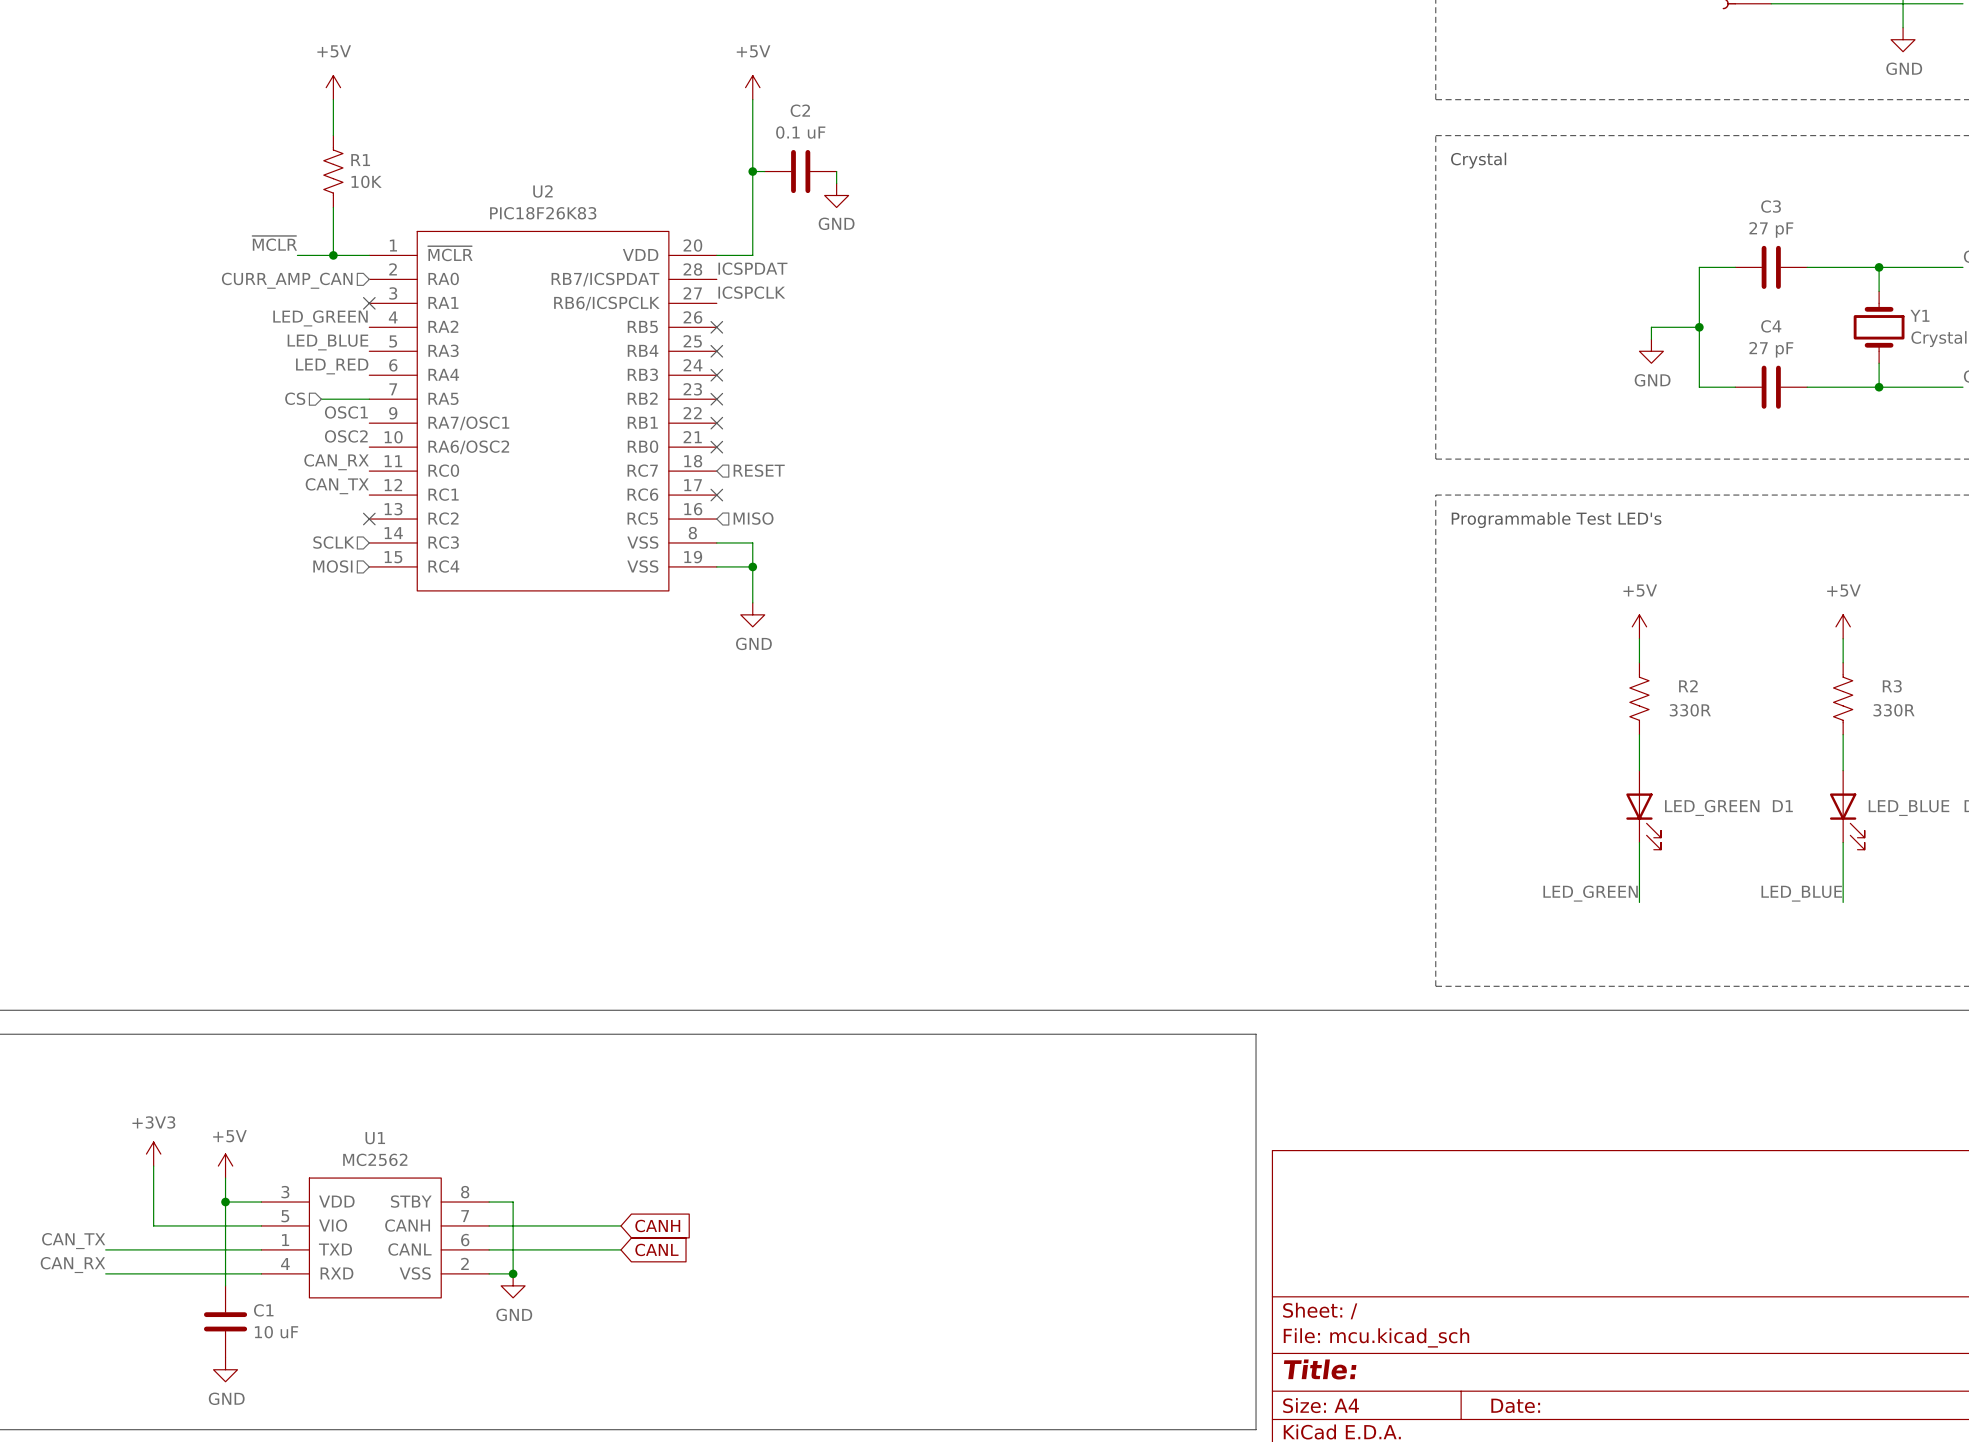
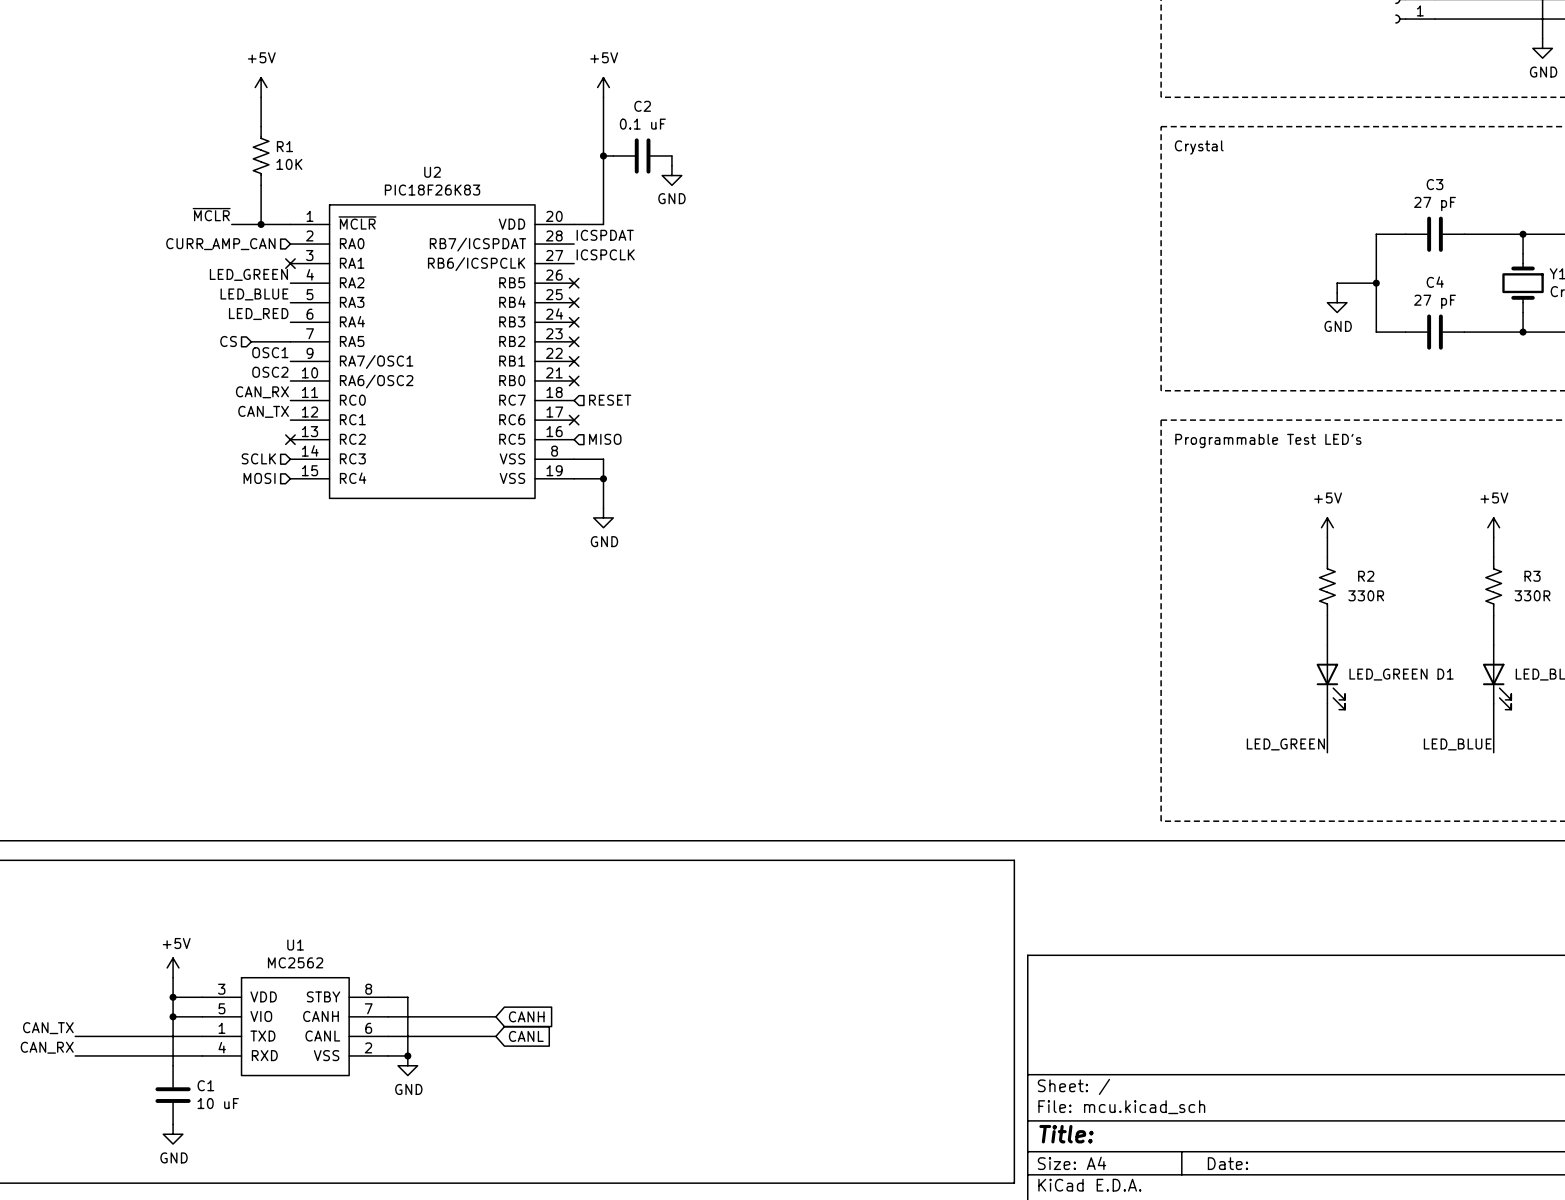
power symbol: +3V3 (153, 1154) -> none
wire: (153, 1166) (153, 1225) (225, 1225) -> none
junction: none -> (173, 1016)

